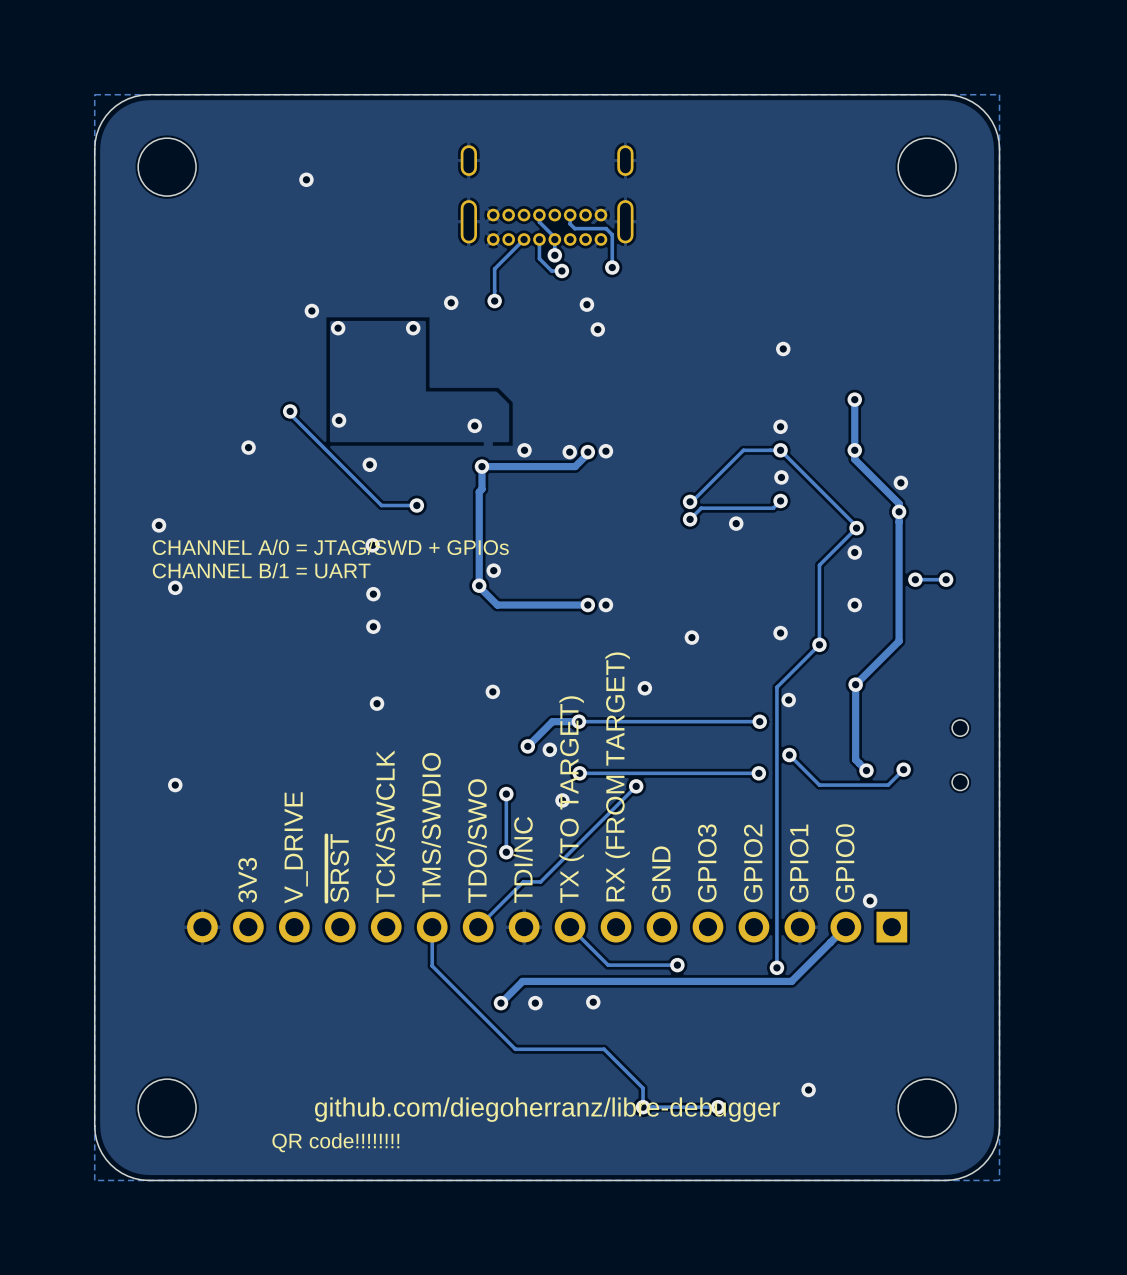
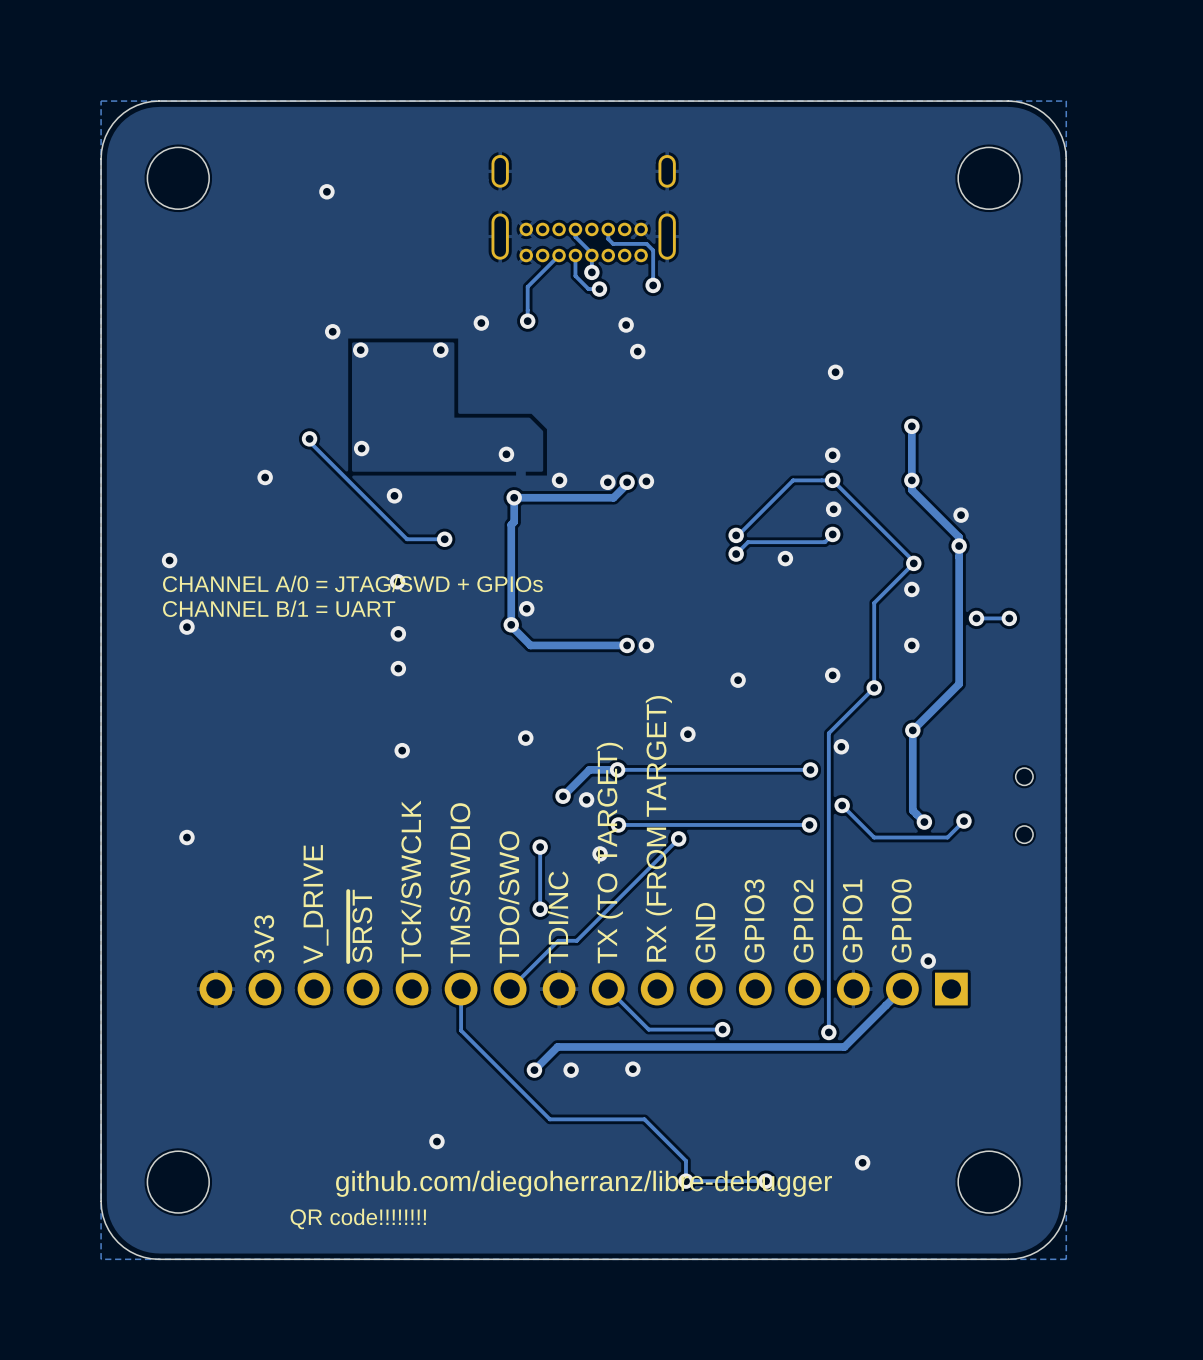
via: none -> (436, 1141)

